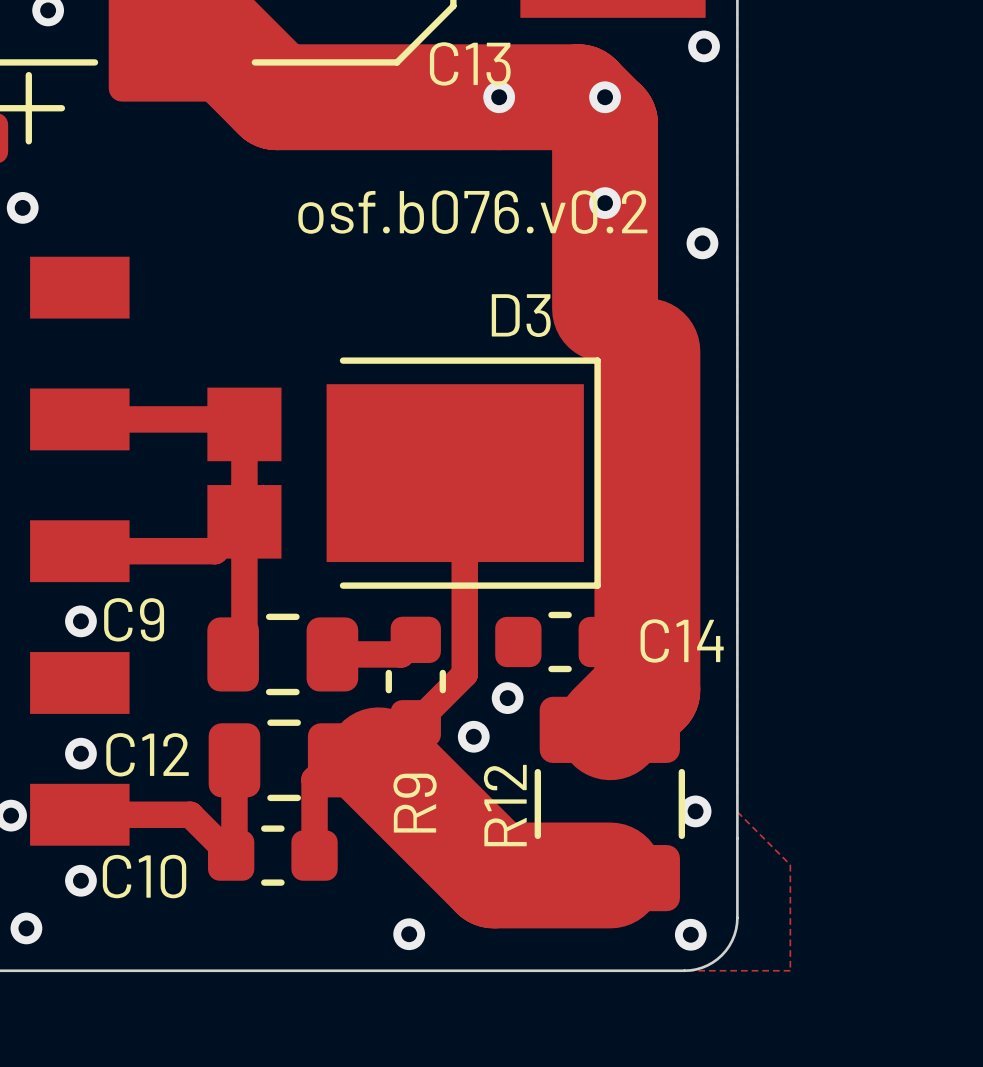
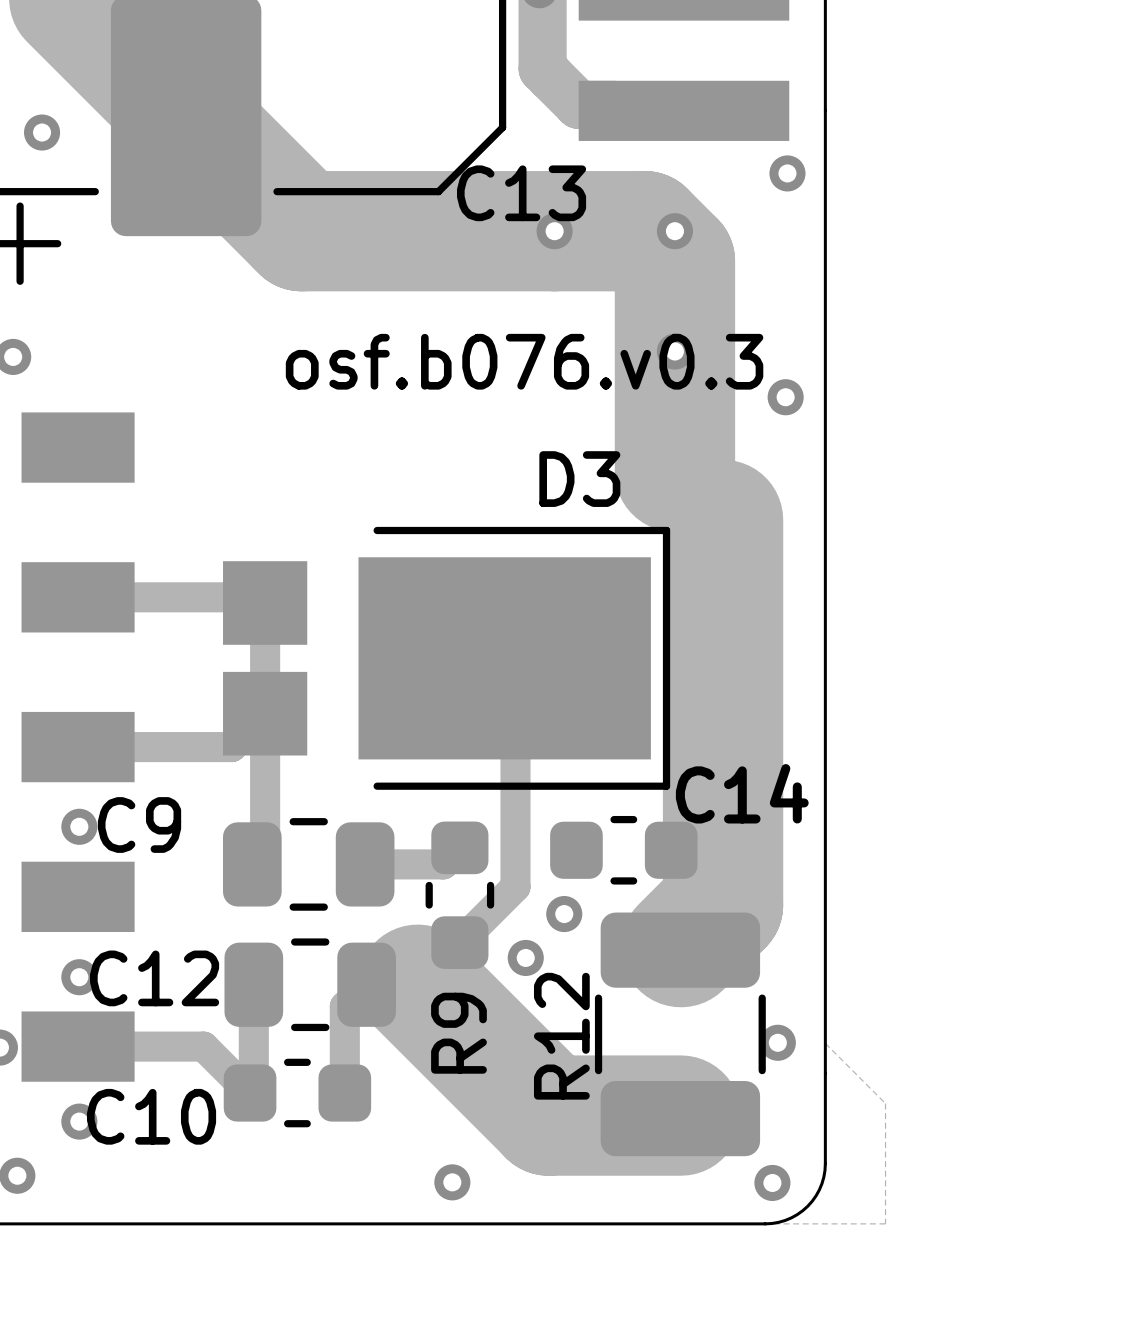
text: osf.b076.v0.2 (472, 212) -> osf.b076.v0.3 (524, 361)
C14 name position: C14 (682, 640) -> C14 (742, 793)

